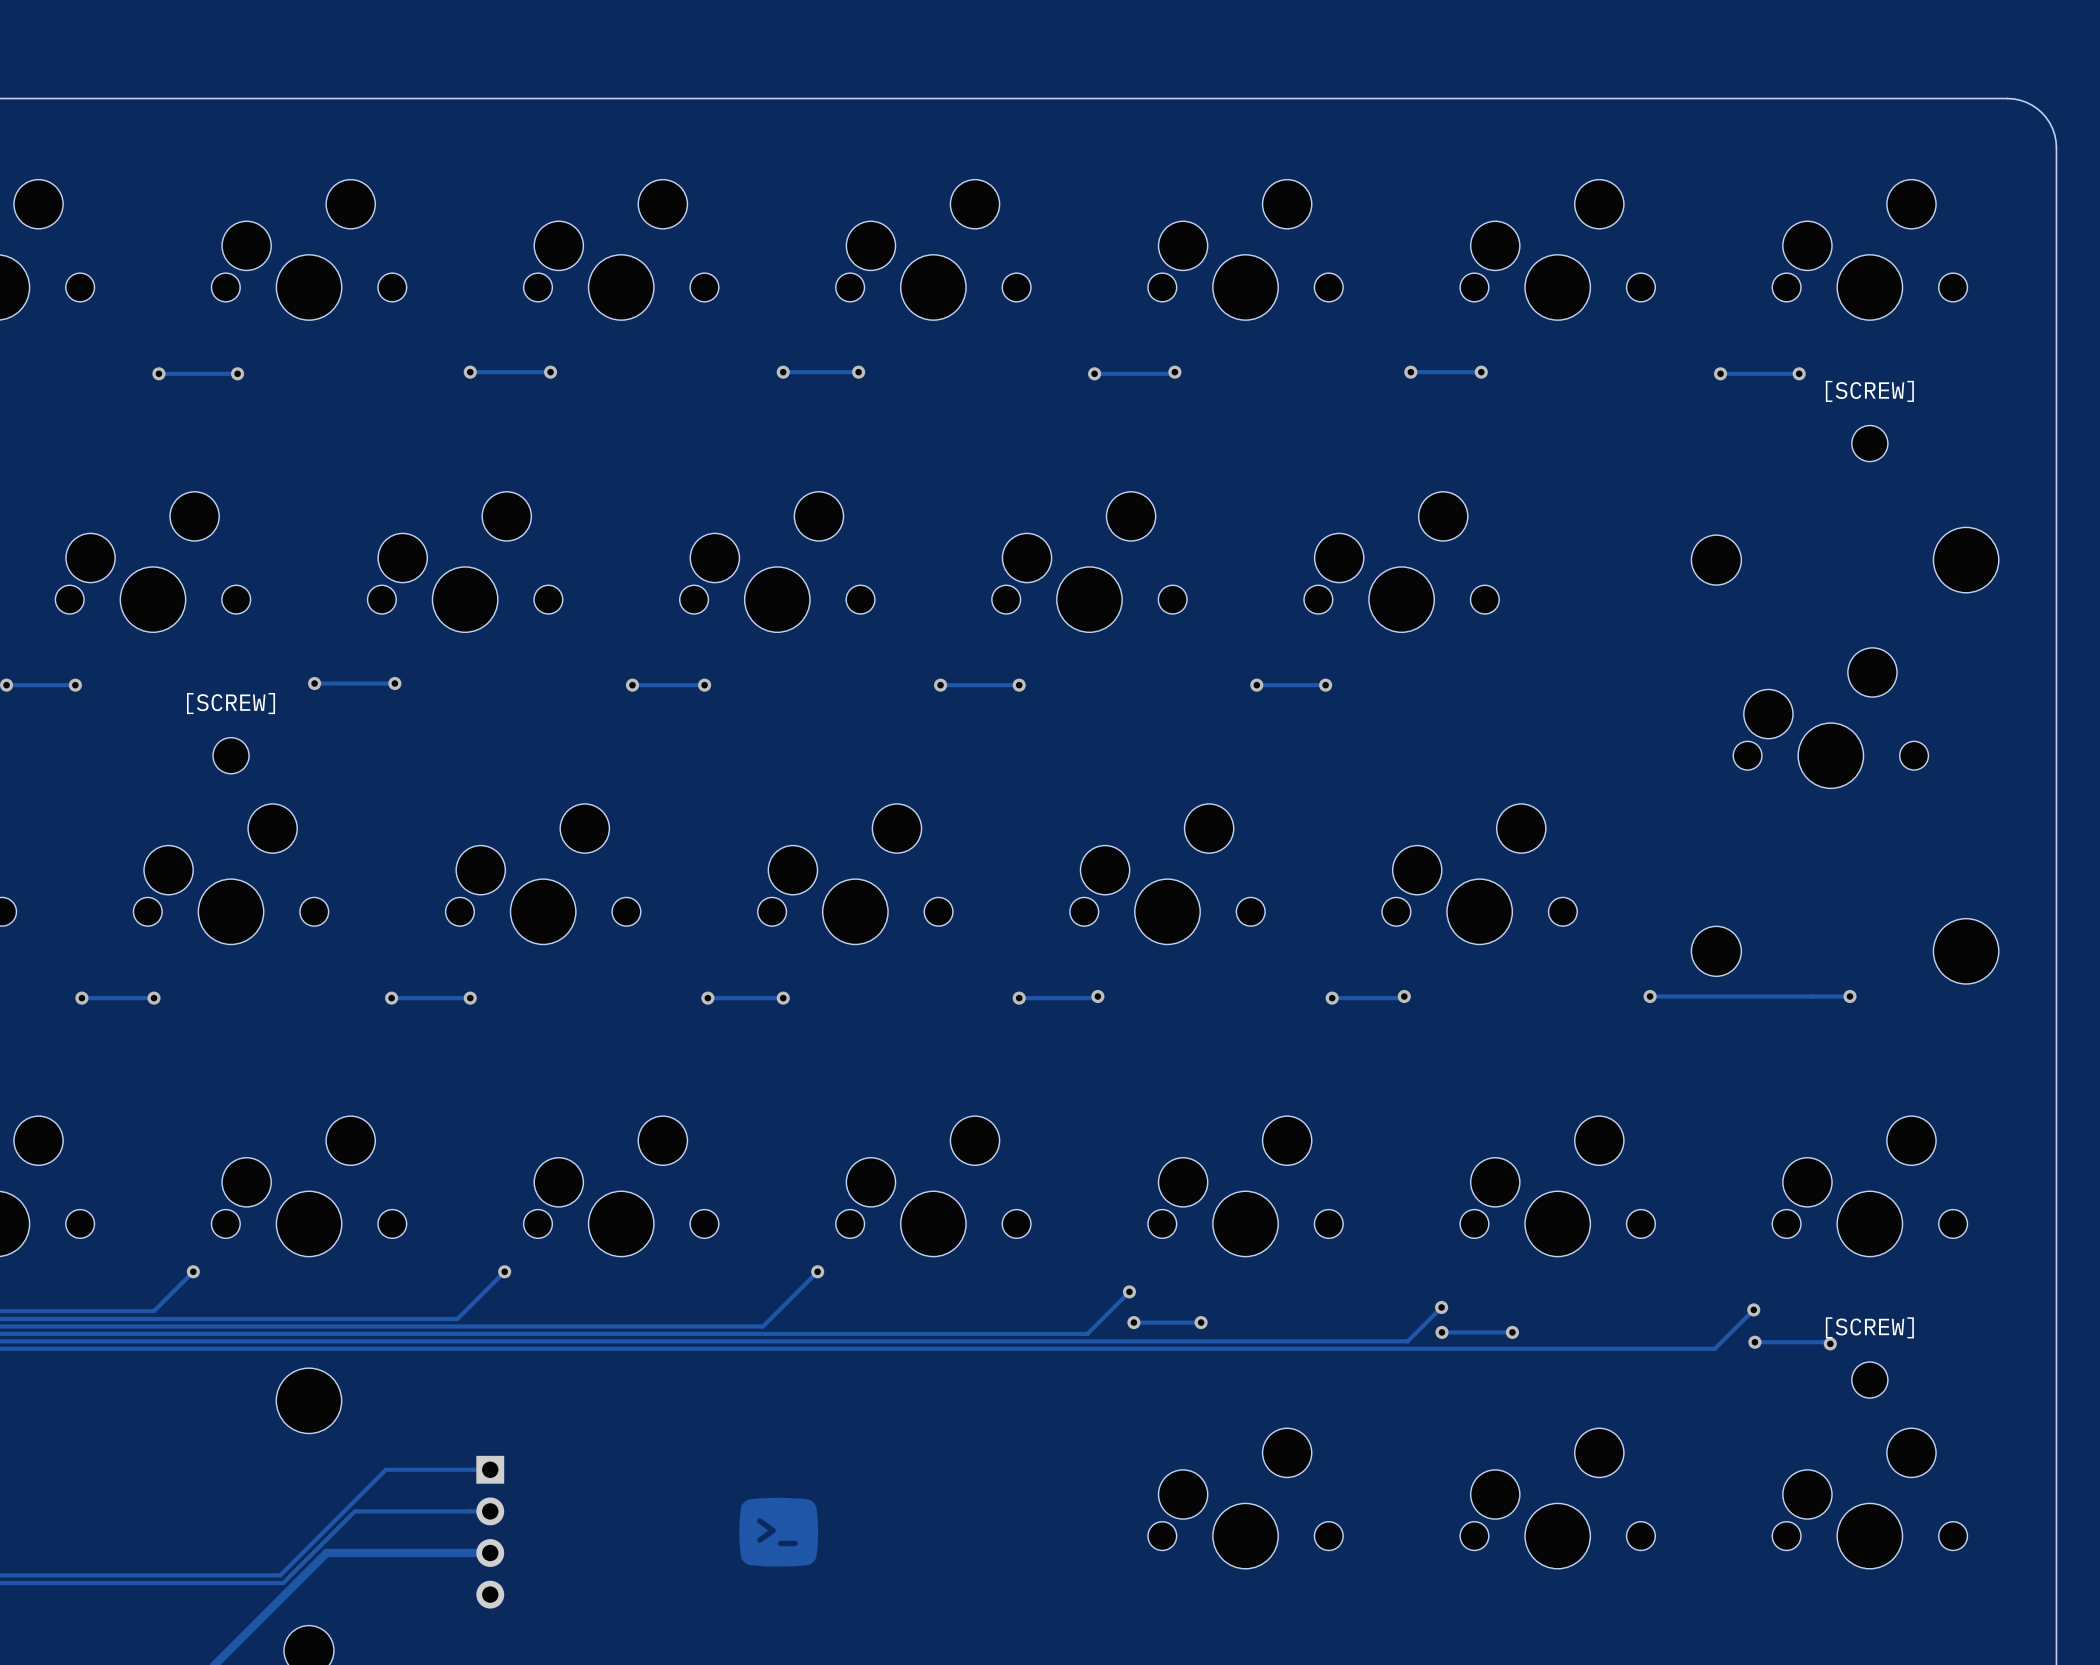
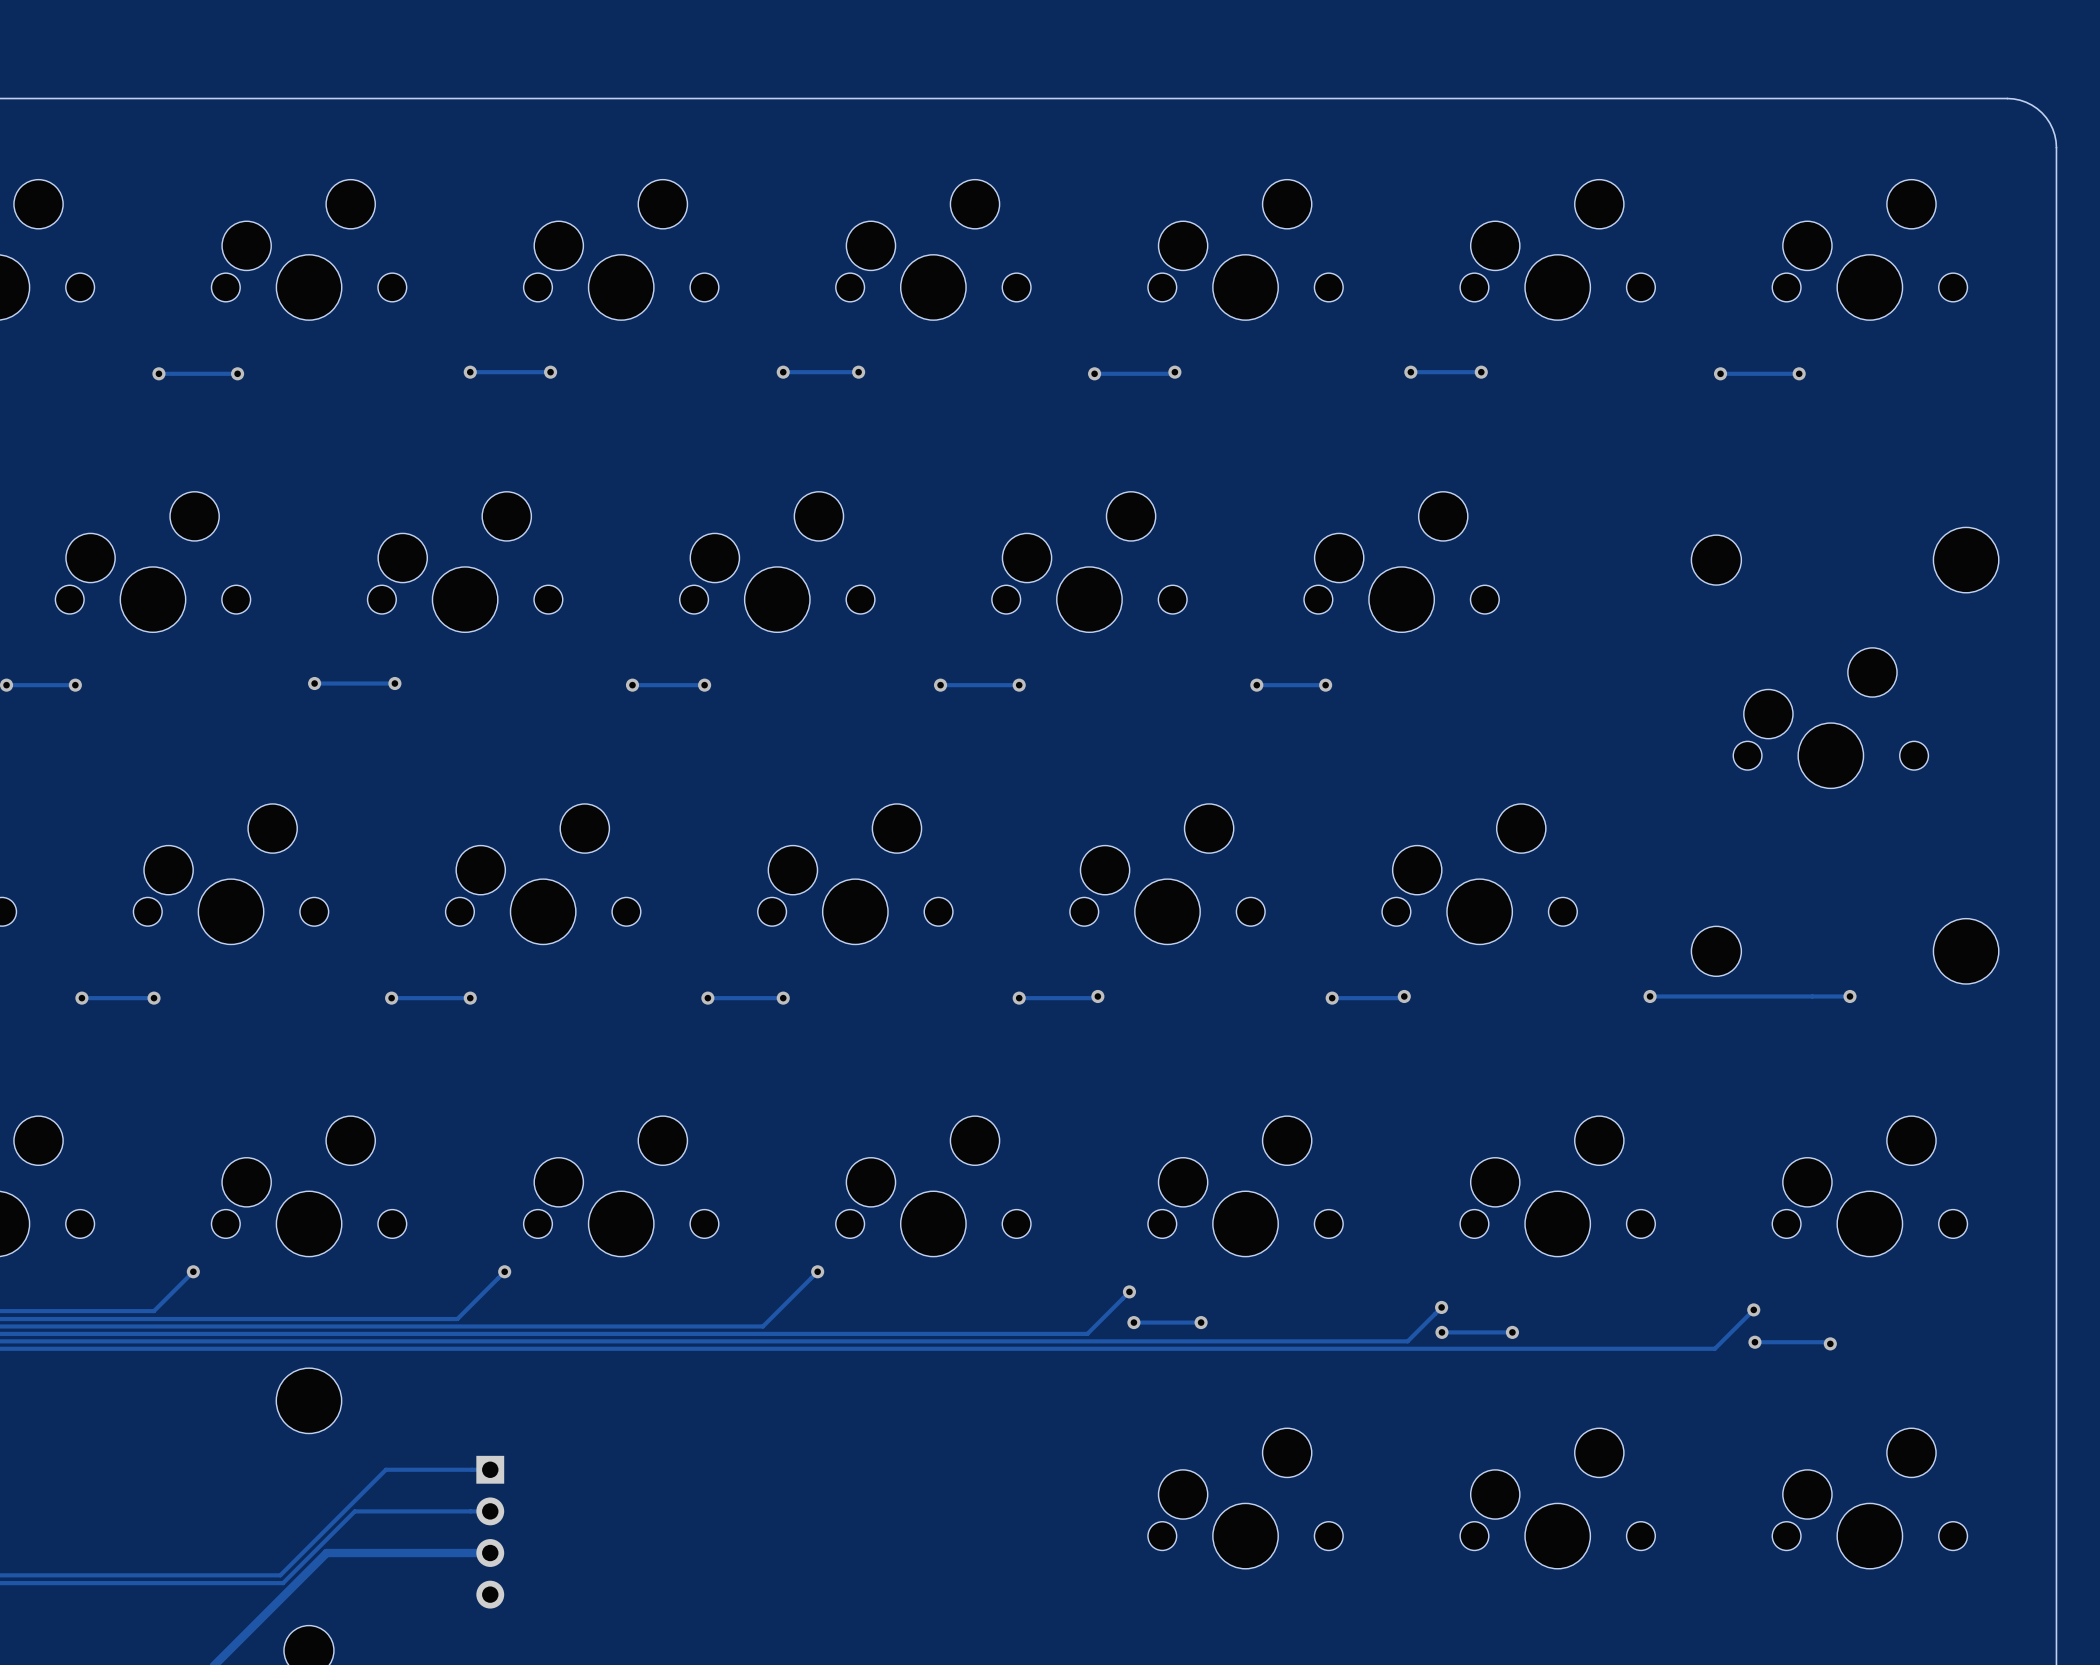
[SCREW]: (1869, 443) -> none
[SCREW]: (231, 755) -> none
[SCREW]: (1869, 1380) -> none
drawing: [739, 1497, 819, 1567] -> none

